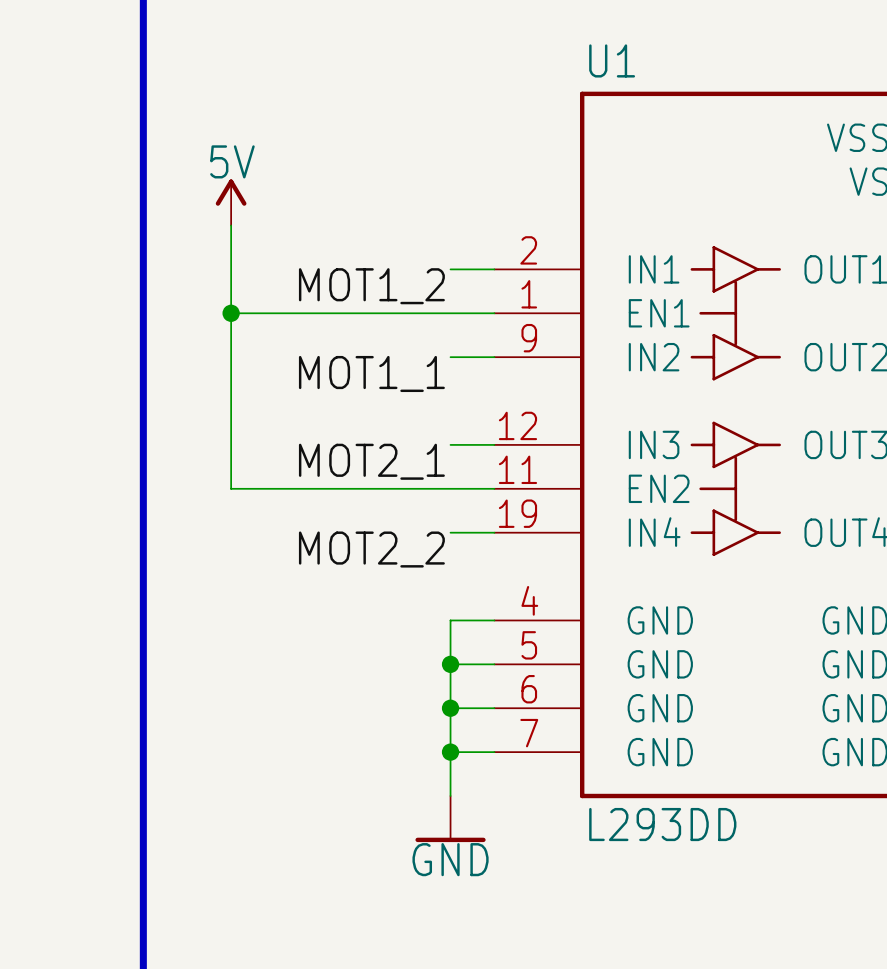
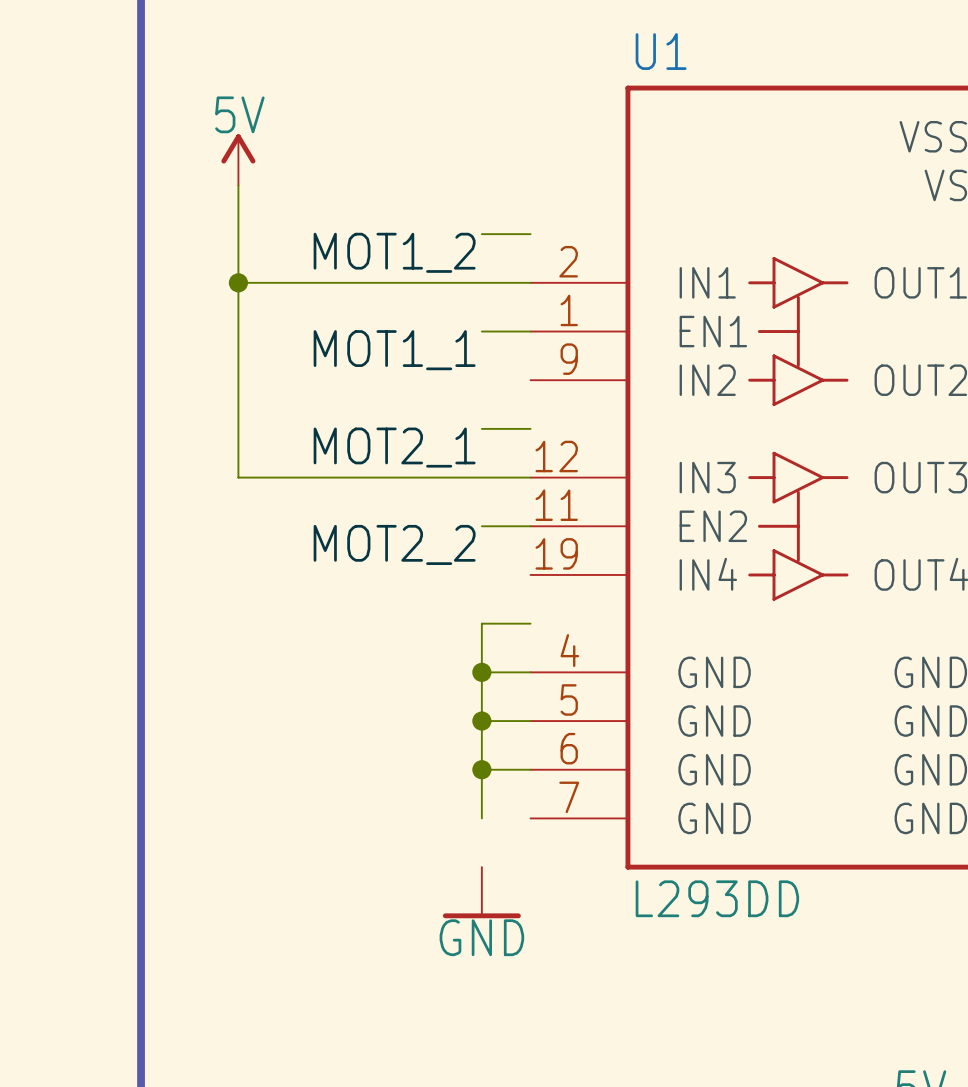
power symbol position: 5V (231, 202) -> 5V (238, 159)
label position: MOT1_2 (371, 286) -> MOT1_2 (394, 252)
wire: (231, 313) (450, 313) -> (238, 282) (481, 282)
junction position: (231, 313) -> (238, 282)
wire: (450, 357) (494, 357) -> (481, 428) (530, 428)
label position: MOT1_1 (371, 373) -> MOT1_1 (394, 350)
wire: (231, 444) (231, 488) (450, 488) -> (238, 477) (481, 477)
label position: MOT2_1 (371, 461) -> MOT2_1 (394, 447)
wire: (450, 532) (494, 532) -> (481, 234) (530, 234)
label position: MOT2_2 (371, 549) -> MOT2_2 (394, 544)
junction: none -> (481, 672)
junction: (450, 752) -> none
wire: (494, 752) (450, 752) (450, 796) -> (530, 623) (481, 623) (481, 672)

